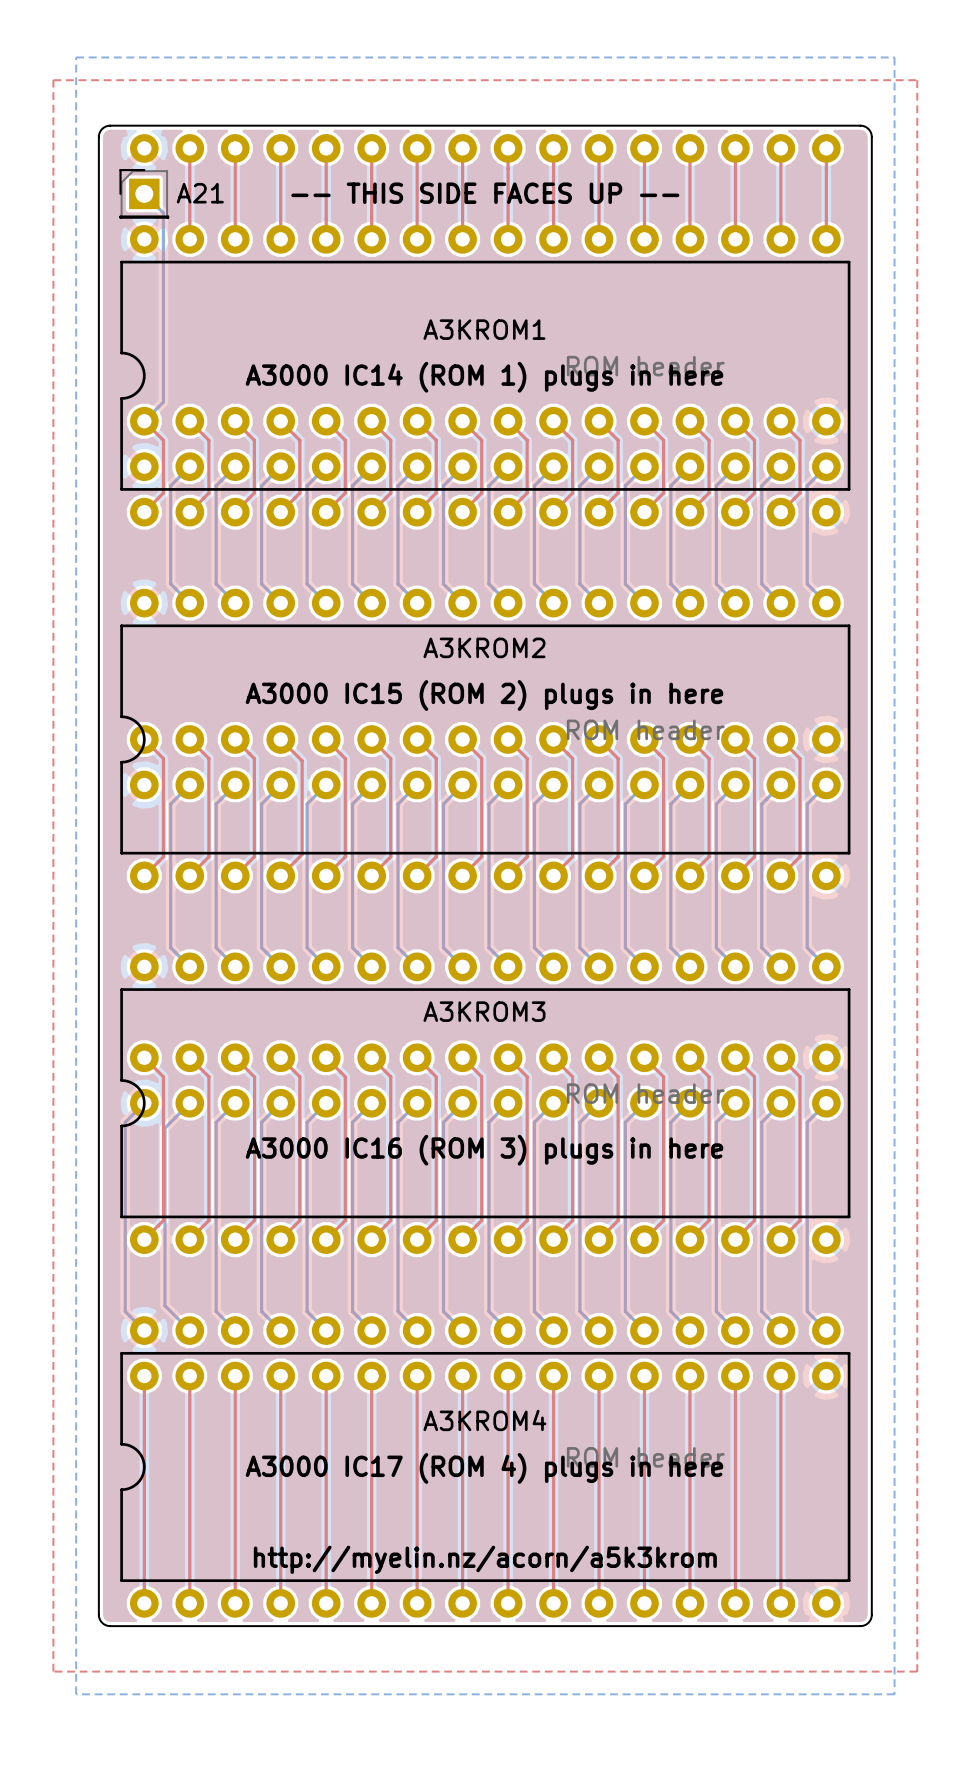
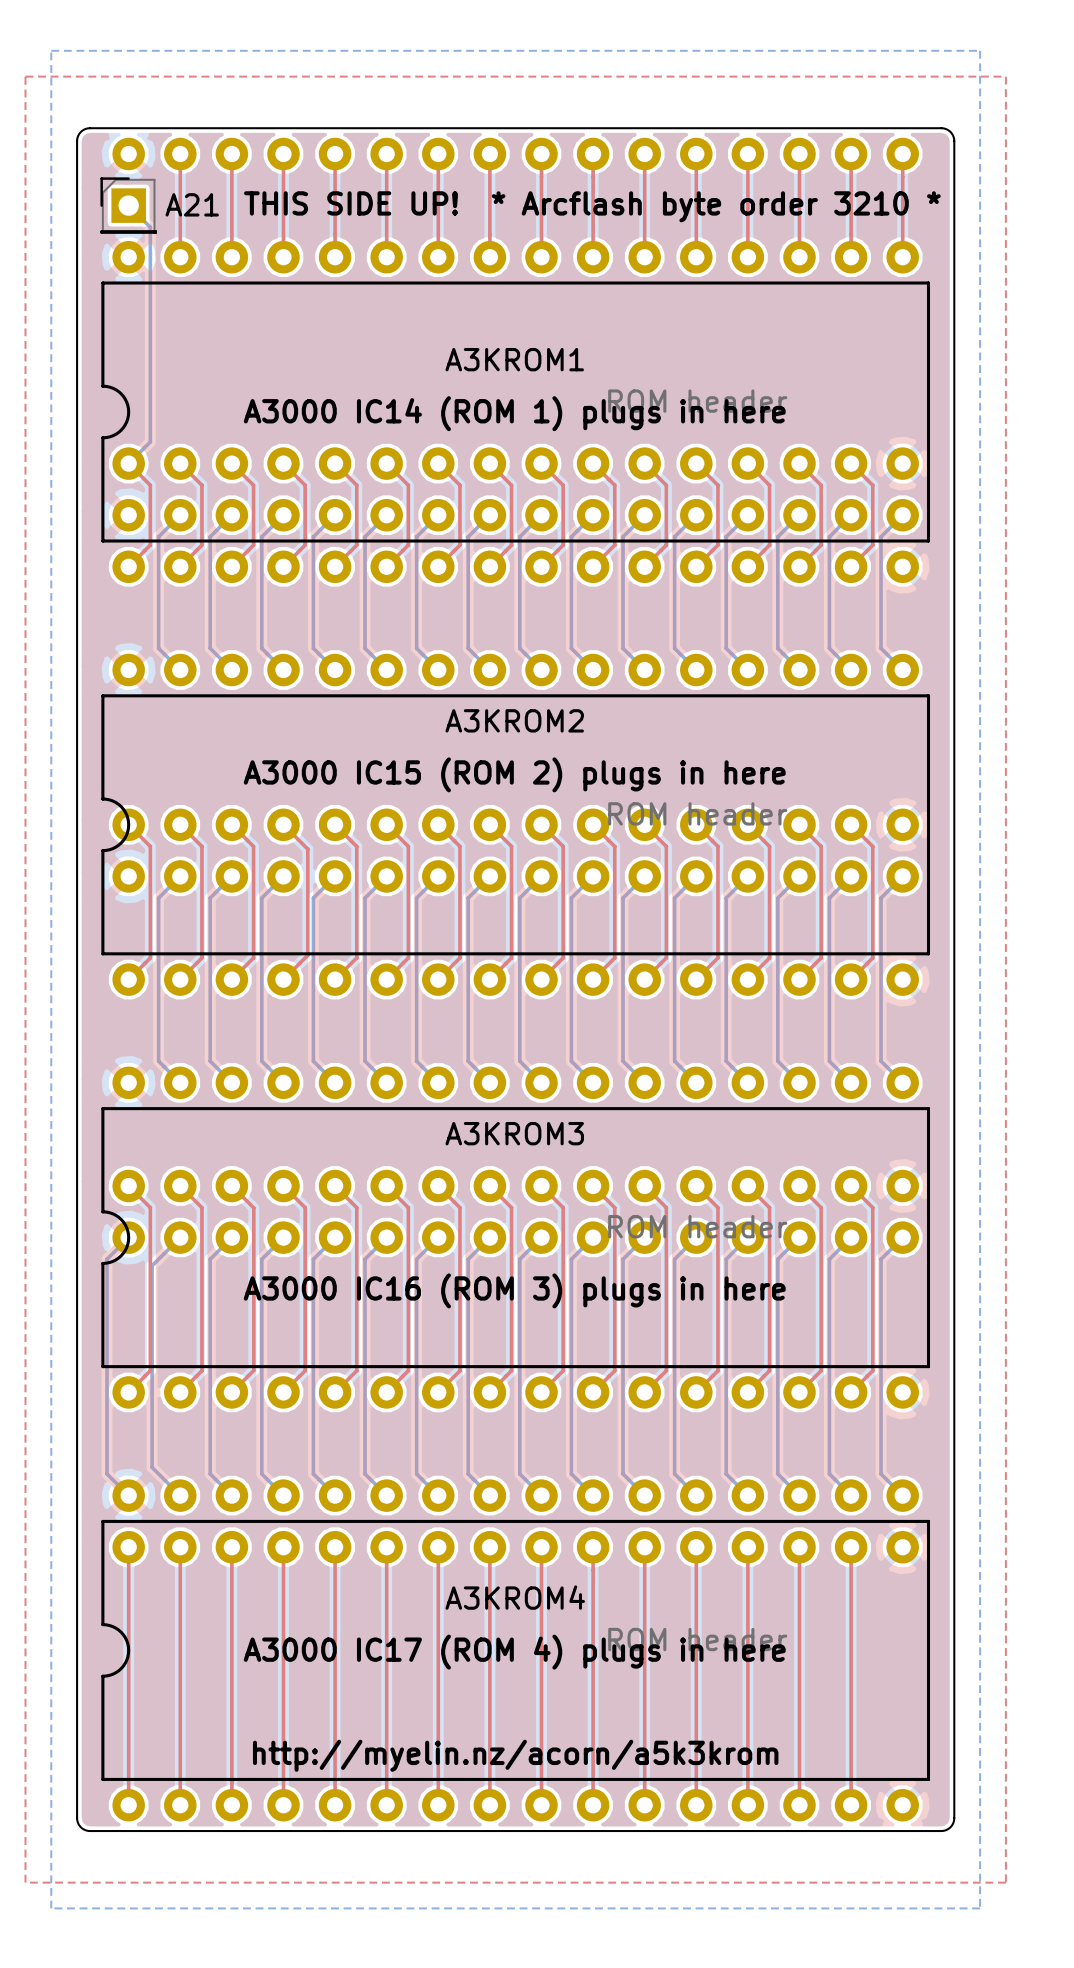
text: -- THIS SIDE FACES UP -- (485, 193) -> none
text: none -> THIS SIDE UP! * Arcflash byte order 3210 * (592, 206)

